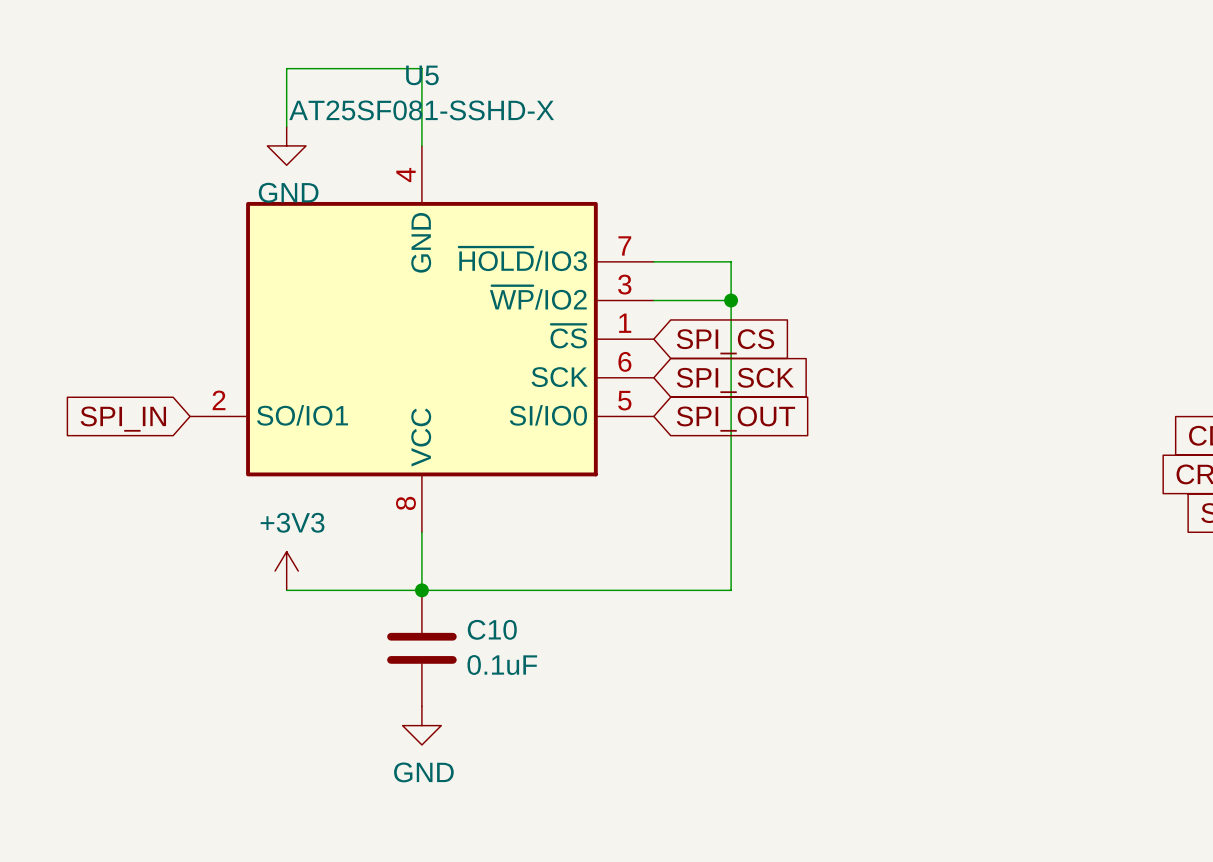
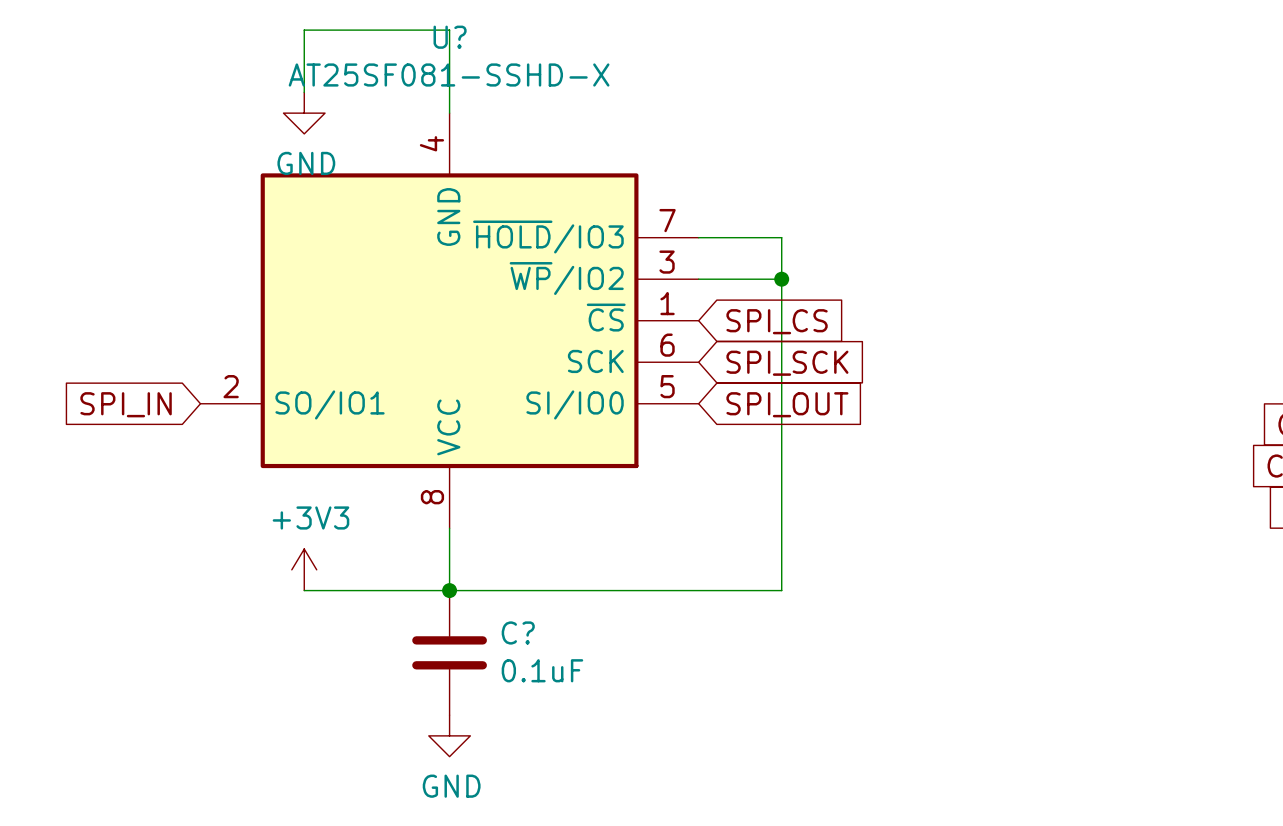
U5 name: U5 (422, 75) -> U? (450, 37)
C10 name: C10 (492, 629) -> C? (518, 632)

